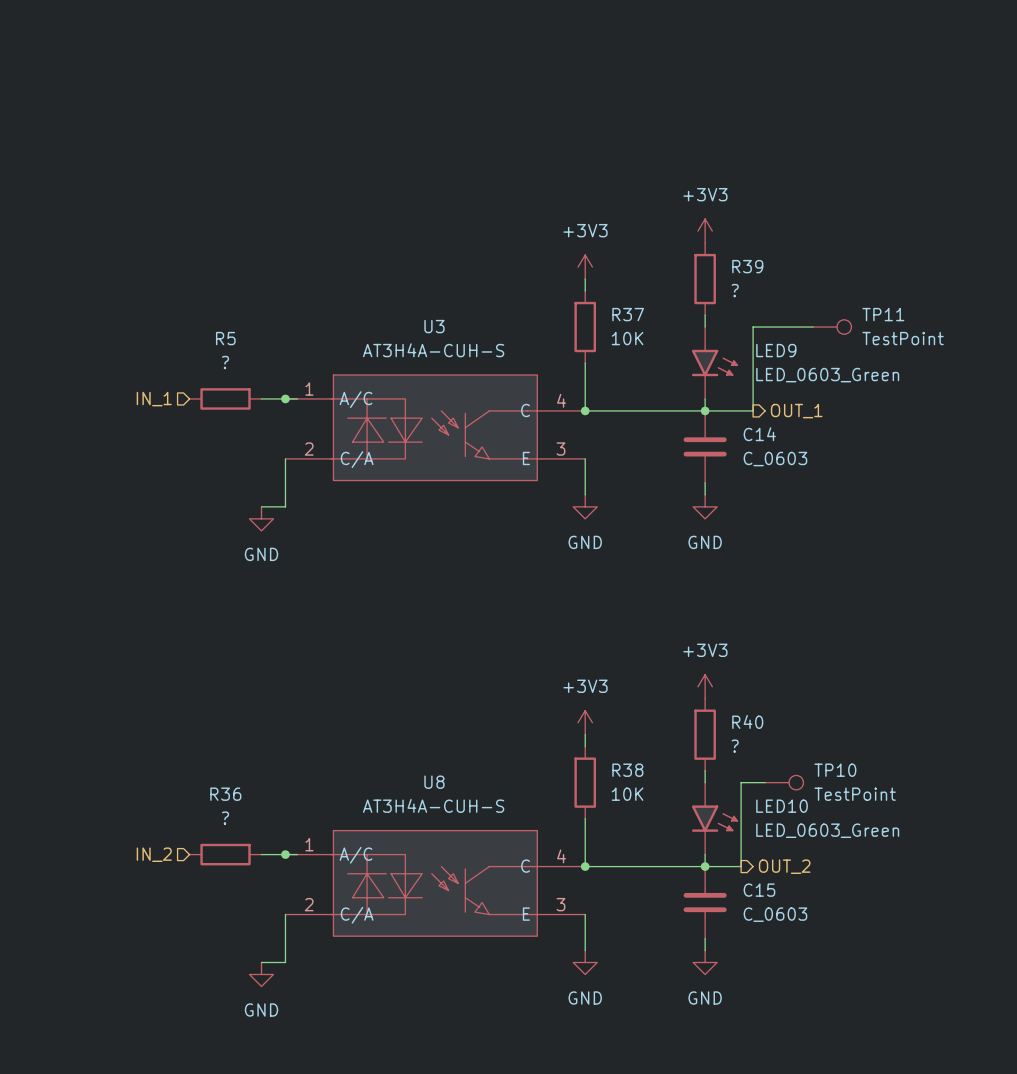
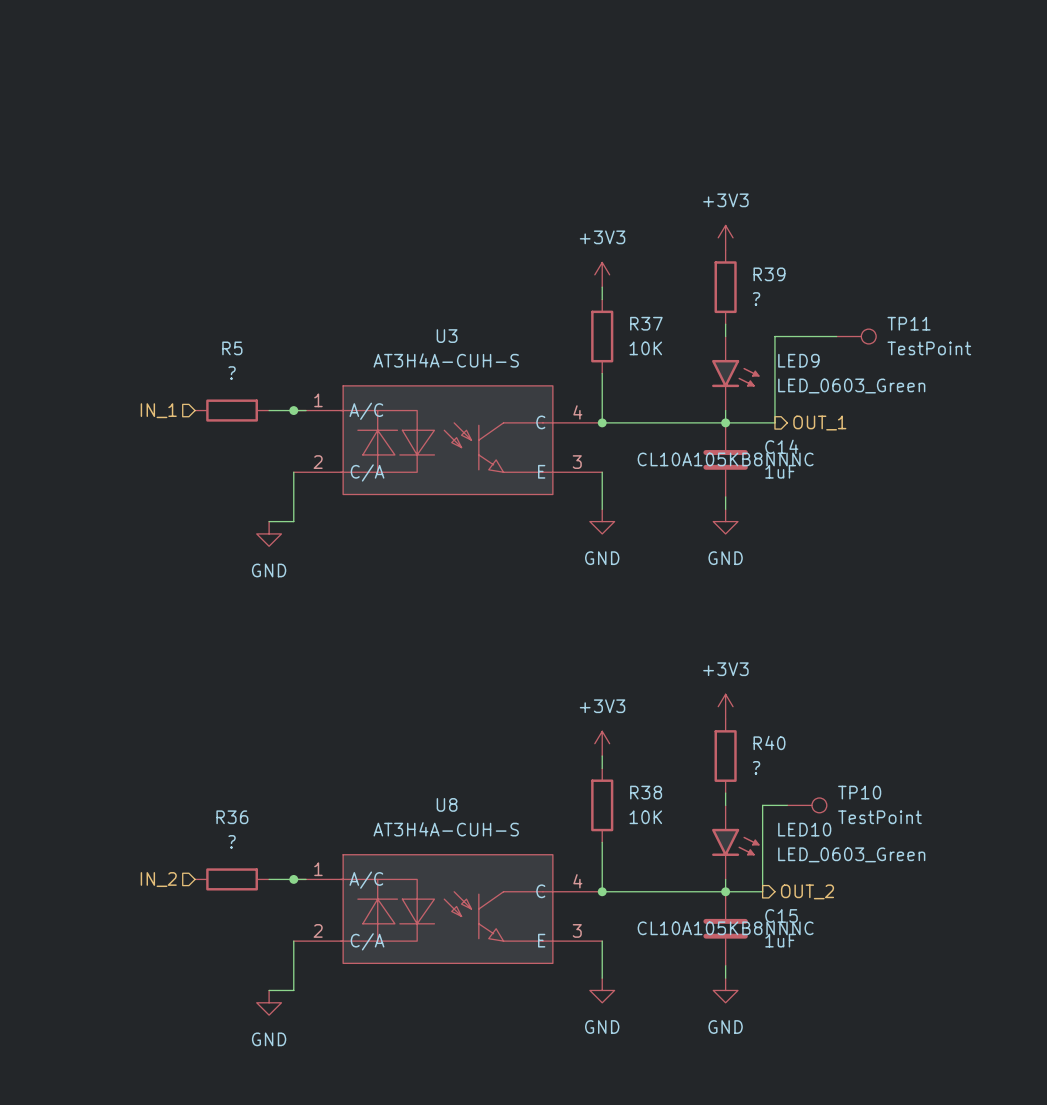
C14 text: none -> CL10A105KB8NNNC (725, 459)
C14 value: C_0603 (775, 459) -> 1uF (780, 471)
C15 text: none -> CL10A105KB8NNNC (725, 928)
C15 value: C_0603 (775, 914) -> 1uF (780, 940)

